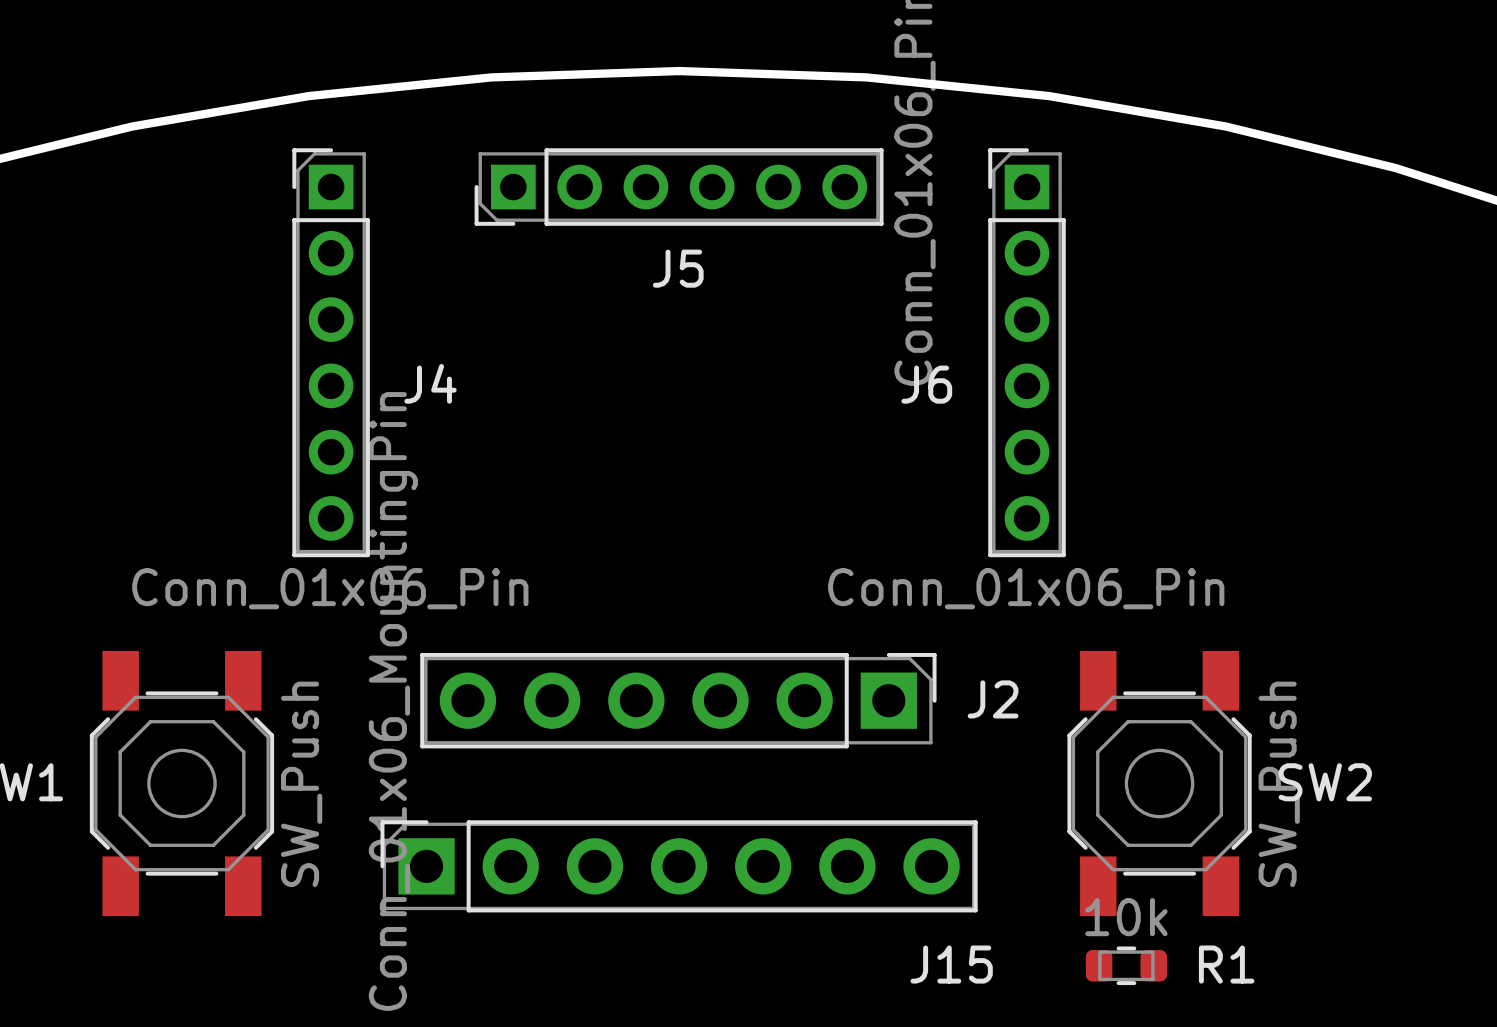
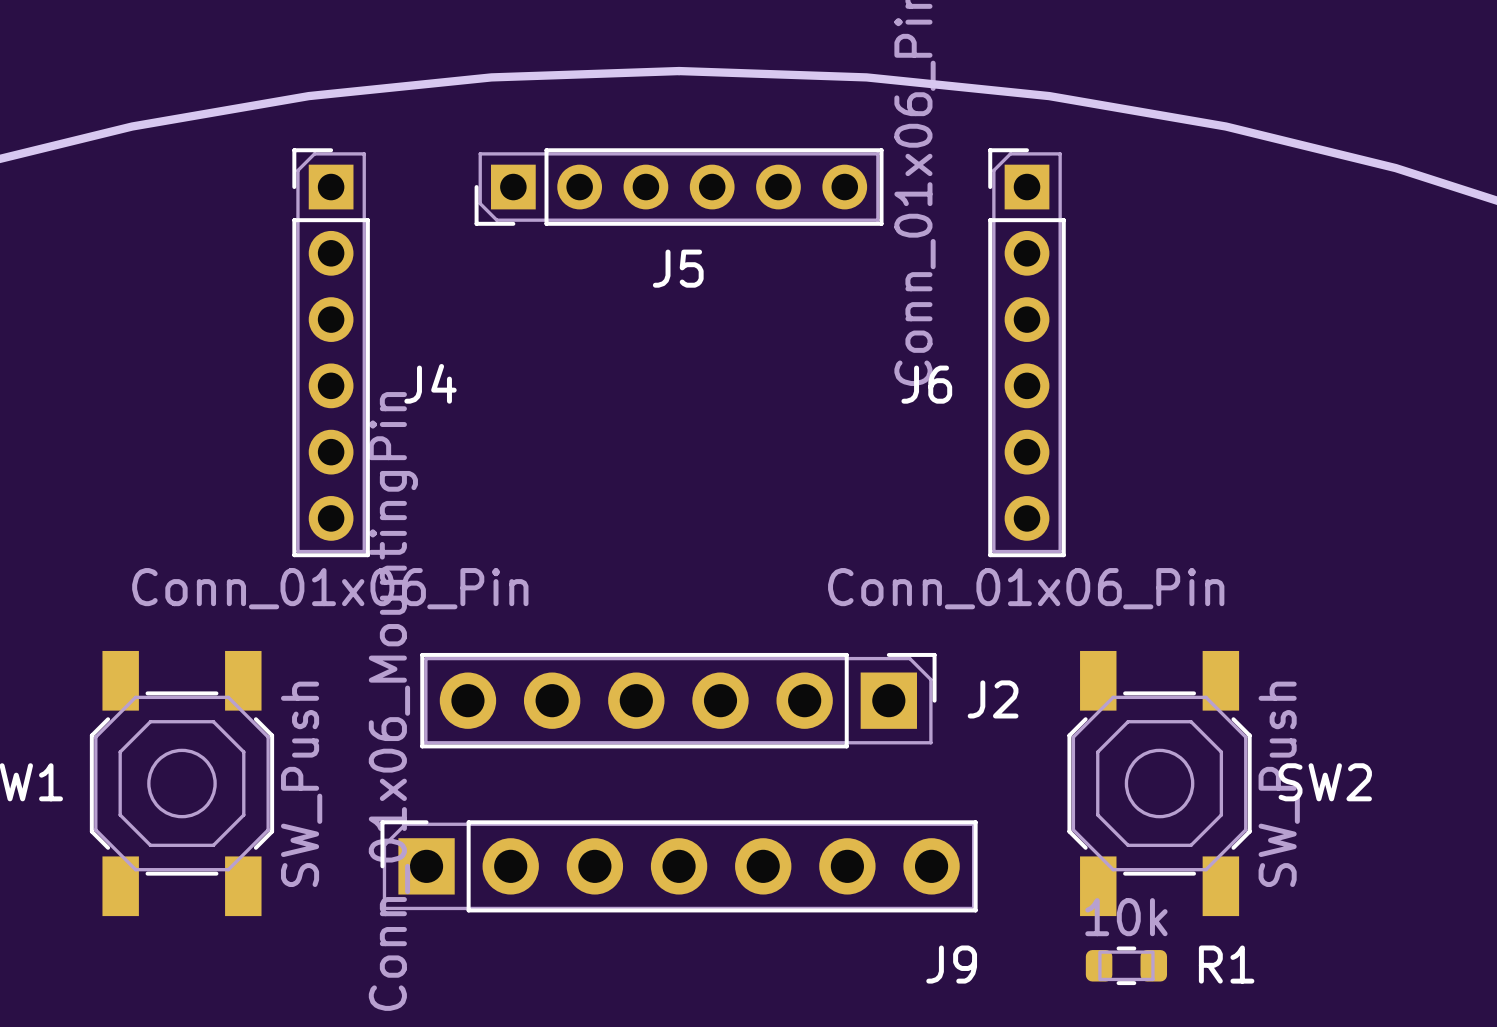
J15 name: J15 (951, 964) -> J9 (951, 964)

